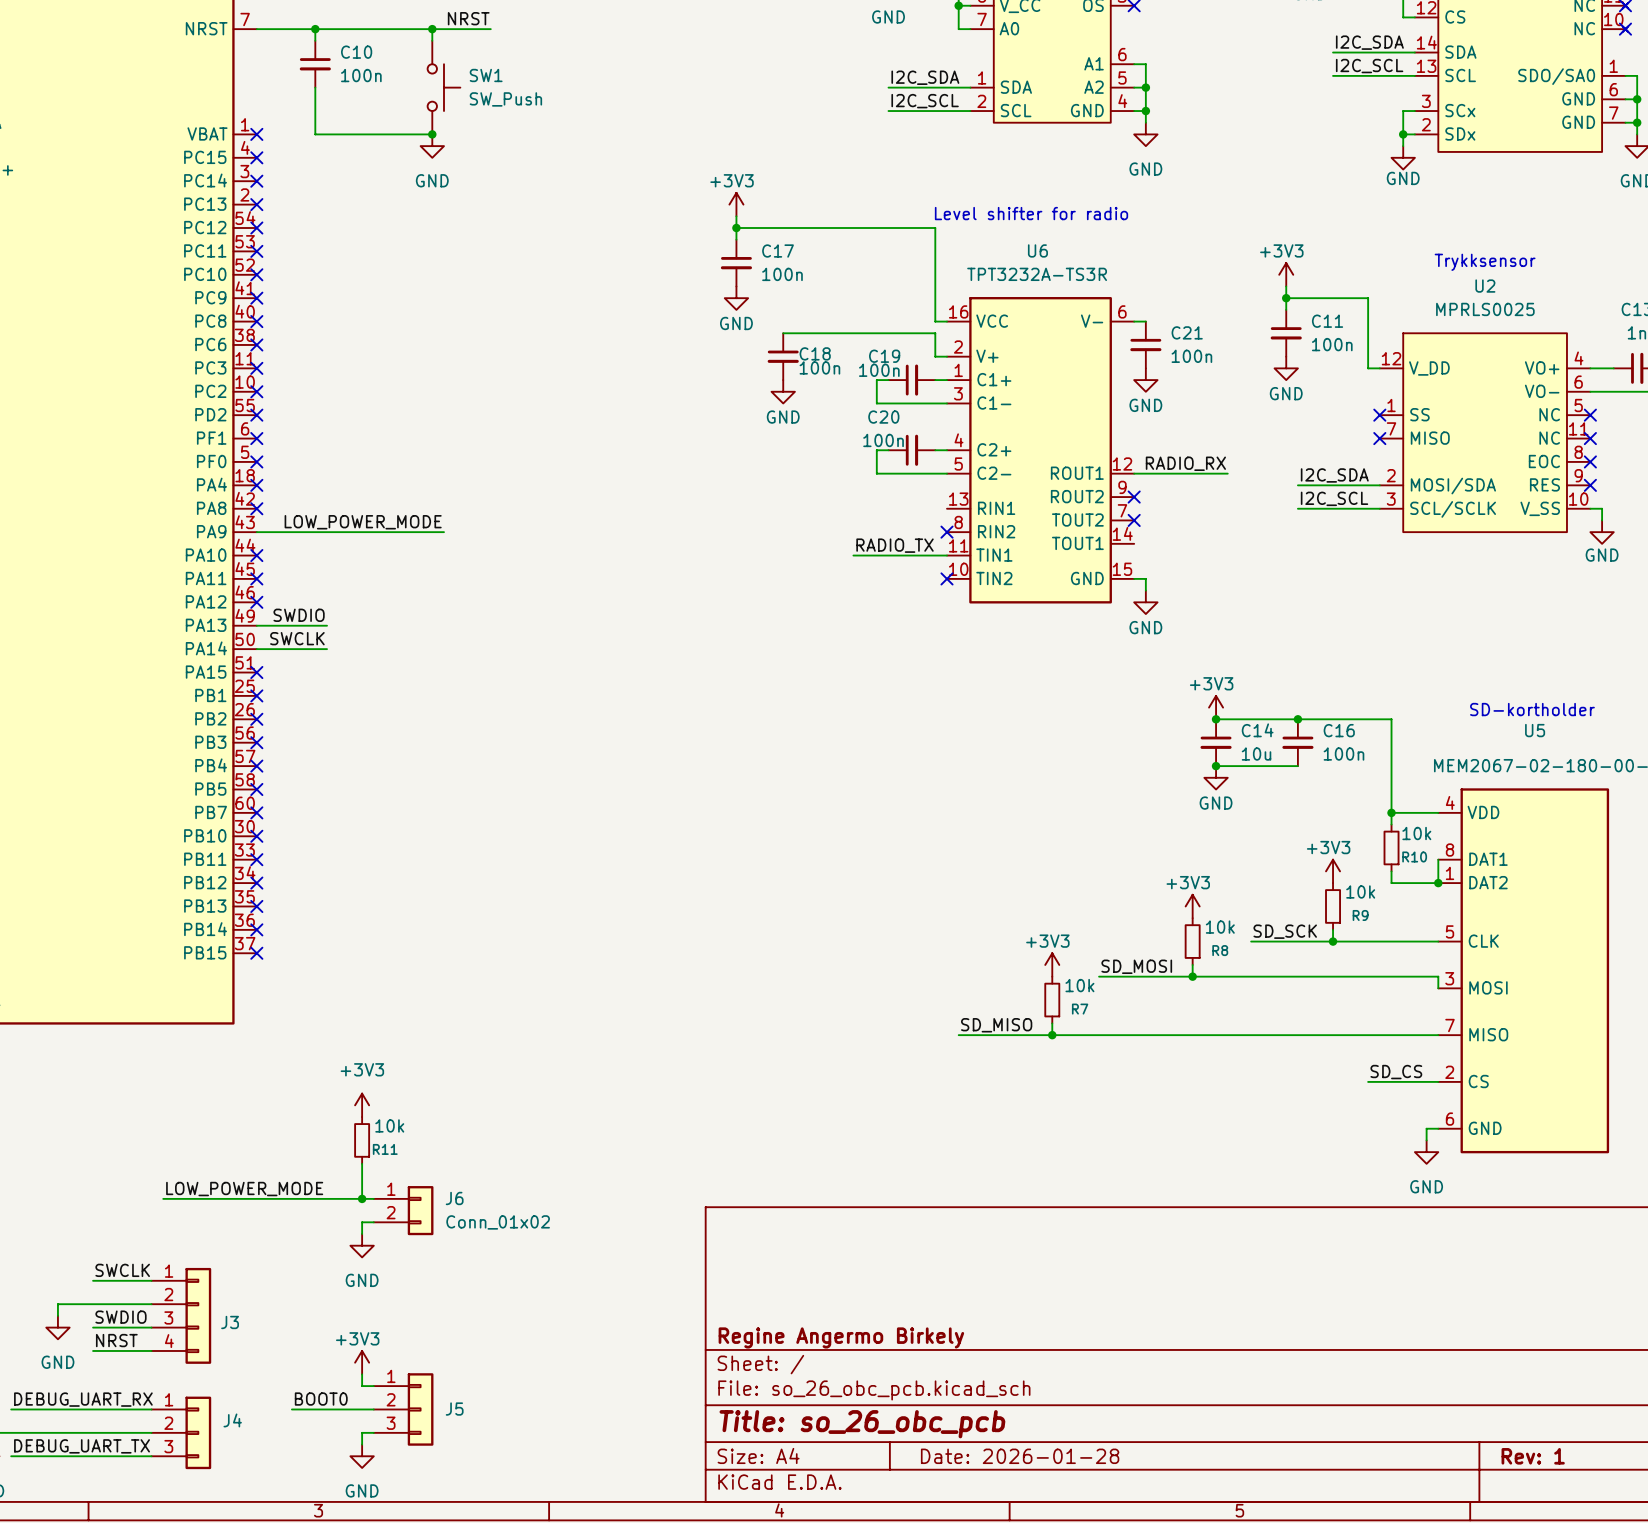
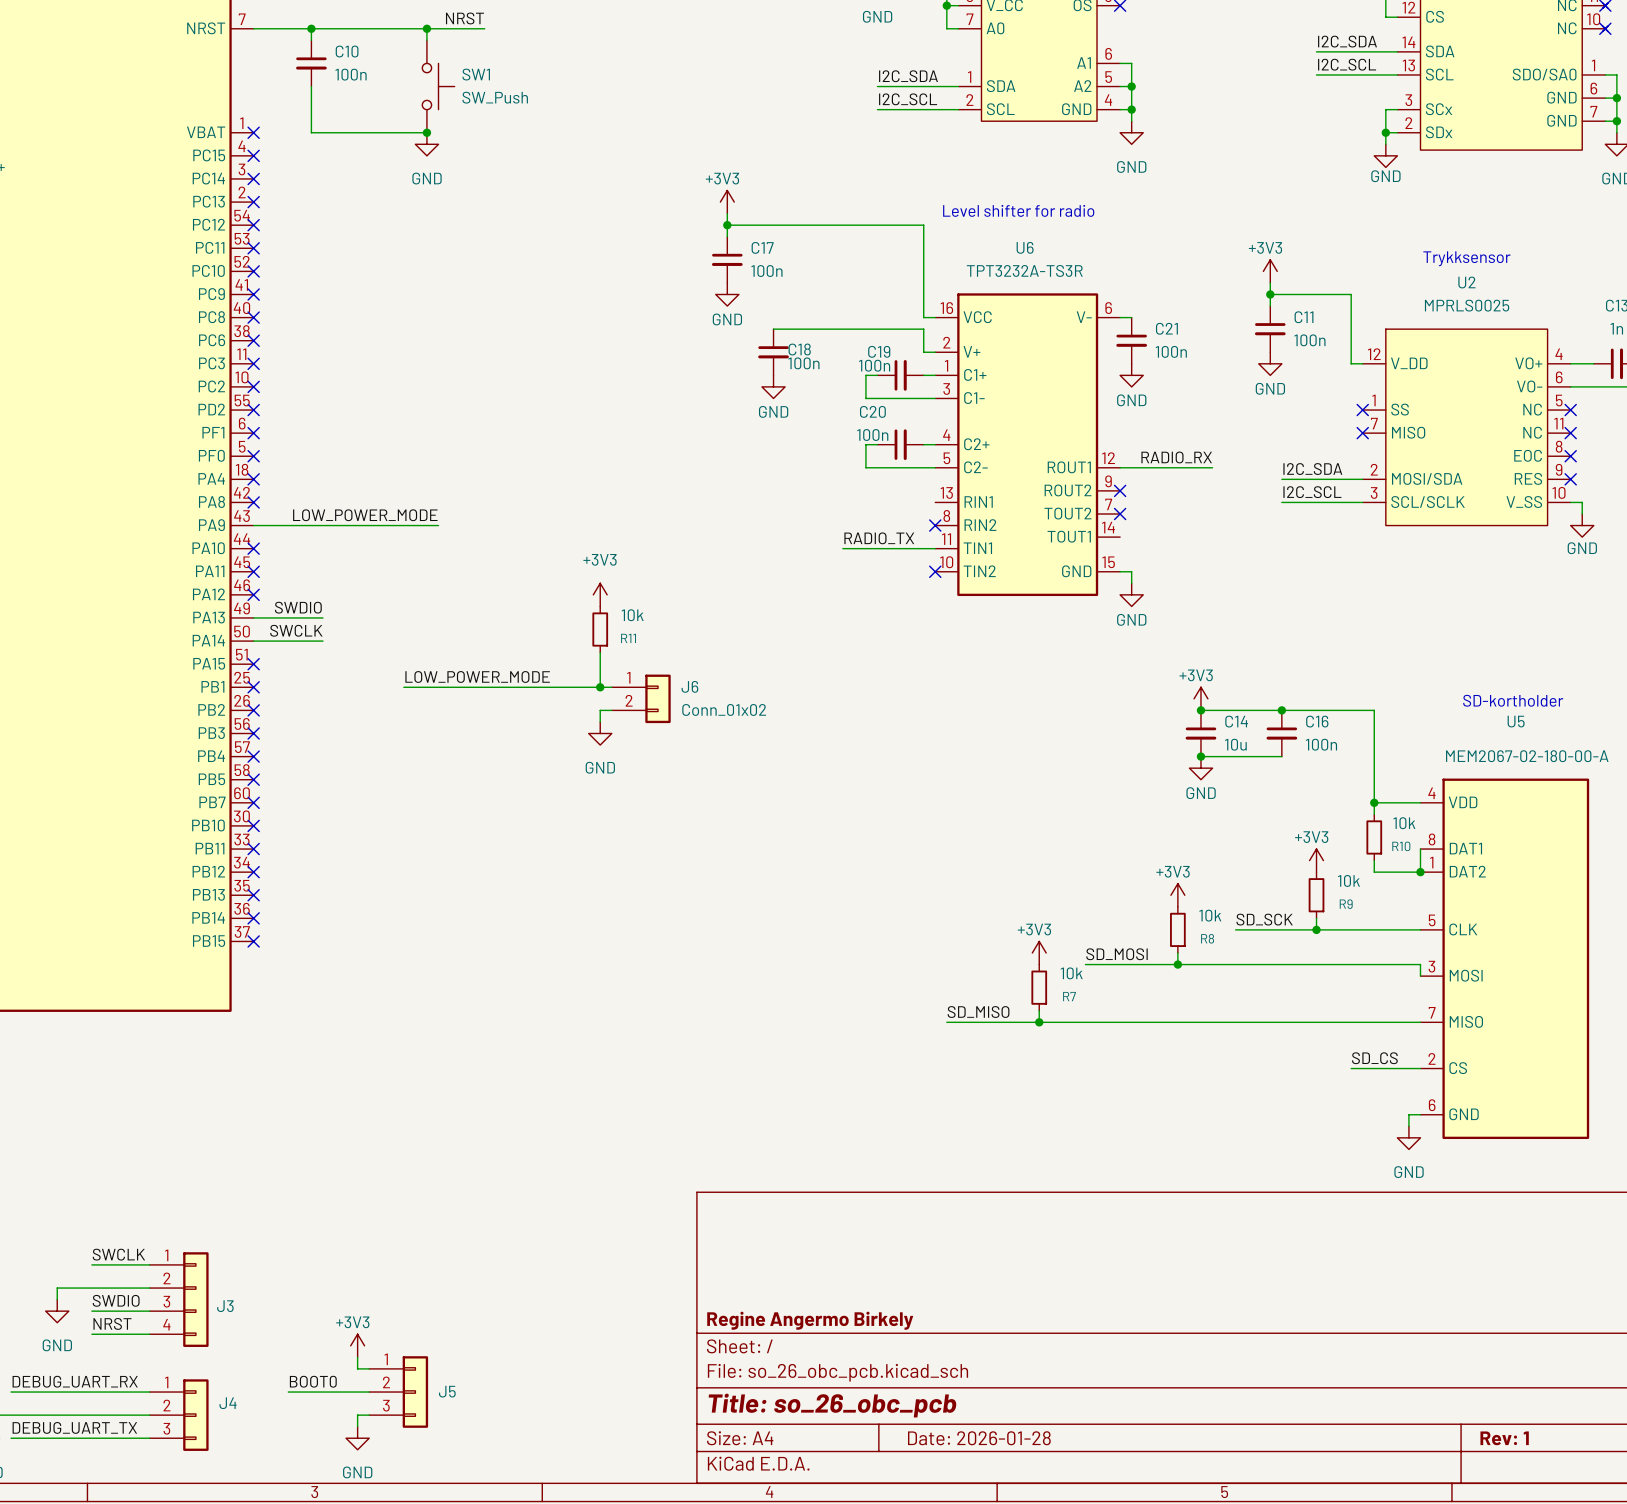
power symbol: none -> +3V3 (600, 594)
wire: none -> (600, 652) (600, 687)
label: none -> LOW_POWER_MODE (477, 676)
wire: none -> (403, 687) (611, 687)
junction: none -> (600, 687)
wire: none -> (611, 710) (600, 710) (600, 721)
power symbol: none -> GND (600, 733)
power symbol: +3V3 (362, 1105) -> none
R11 position: (362, 1140) -> (600, 629)
wire: (362, 1163) (362, 1198) -> none
label: LOW_POWER_MODE (244, 1189) -> none
wire: (163, 1198) (373, 1198) -> none
junction: (362, 1198) -> none
J6 position: (403, 1210) -> (641, 698)
wire: (373, 1222) (362, 1222) (362, 1234) -> none
power symbol: GND (362, 1245) -> none

